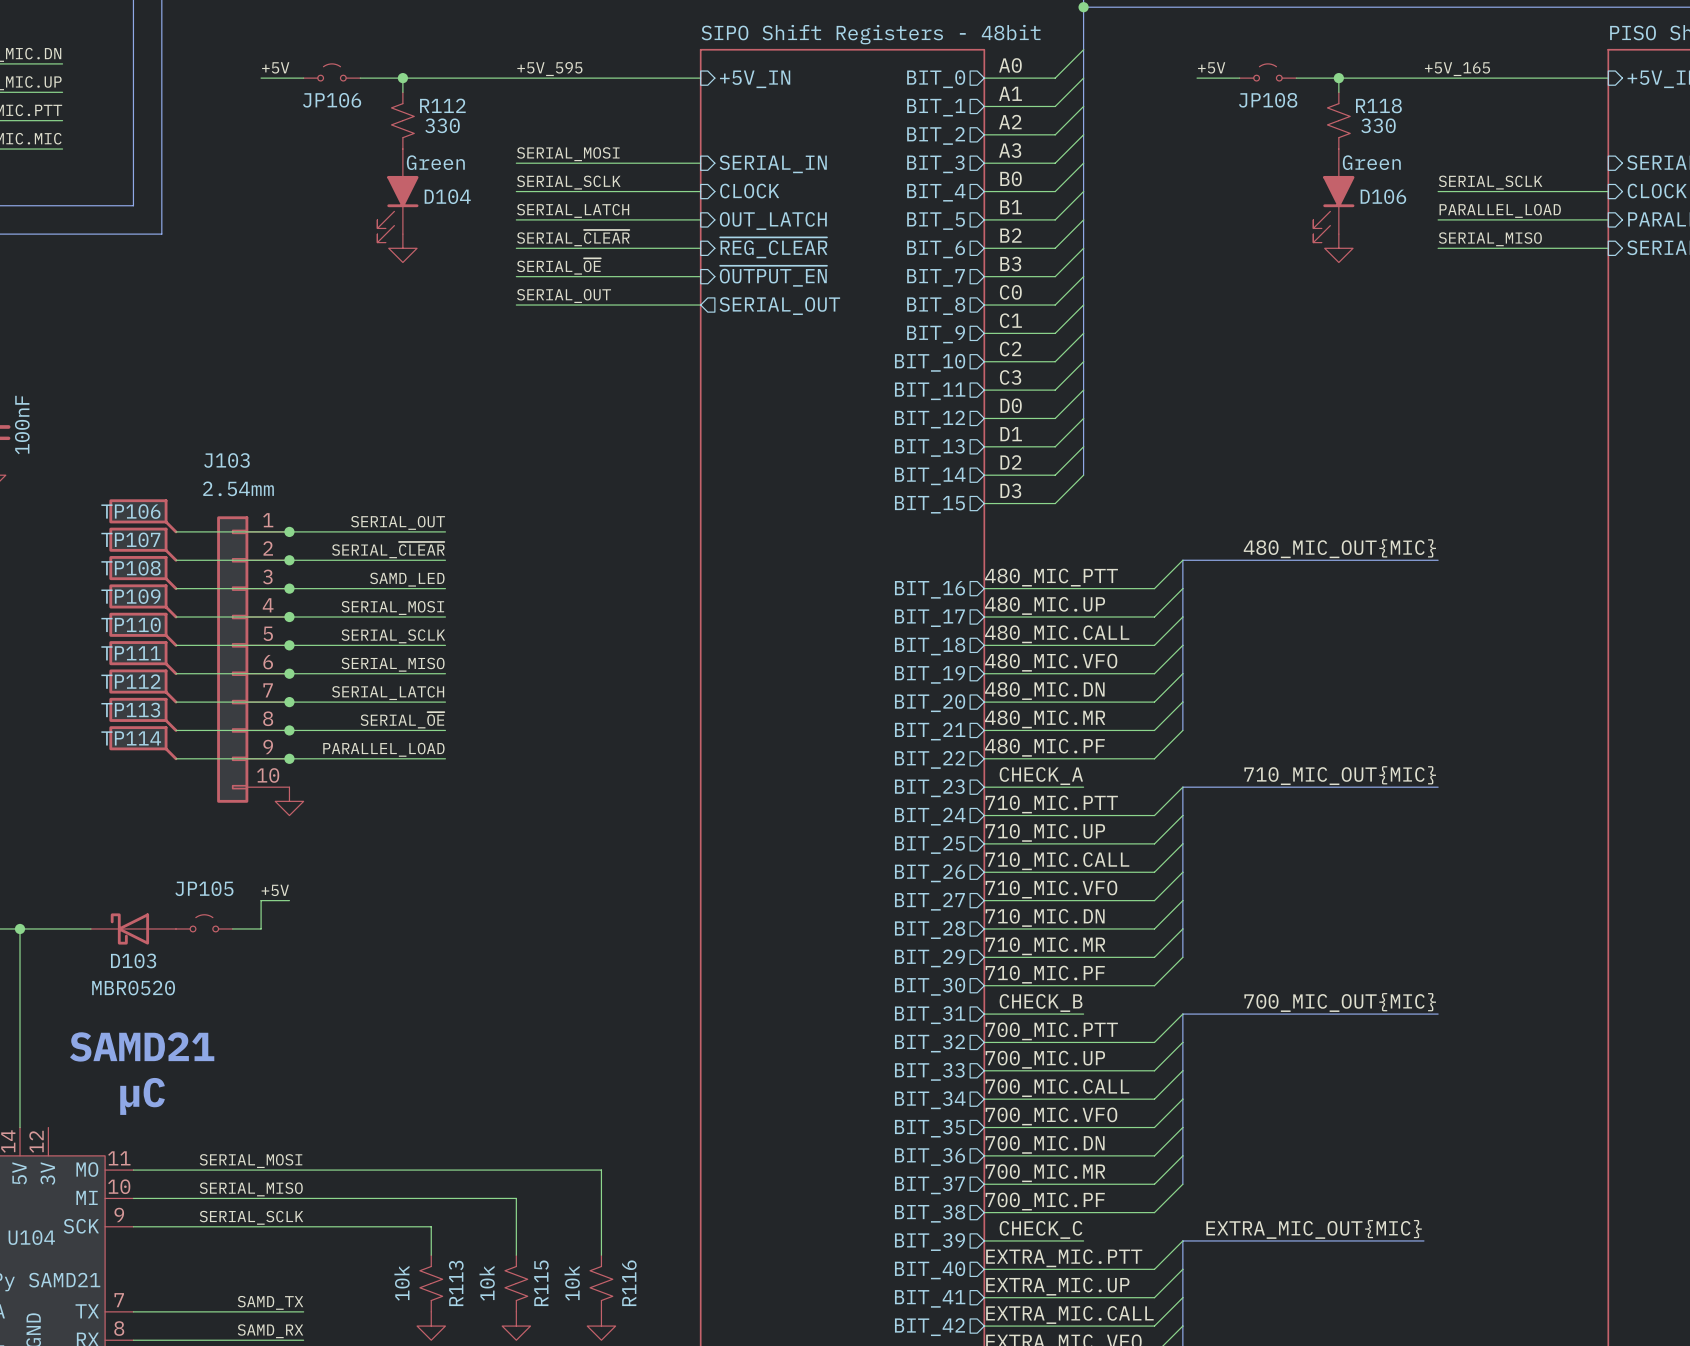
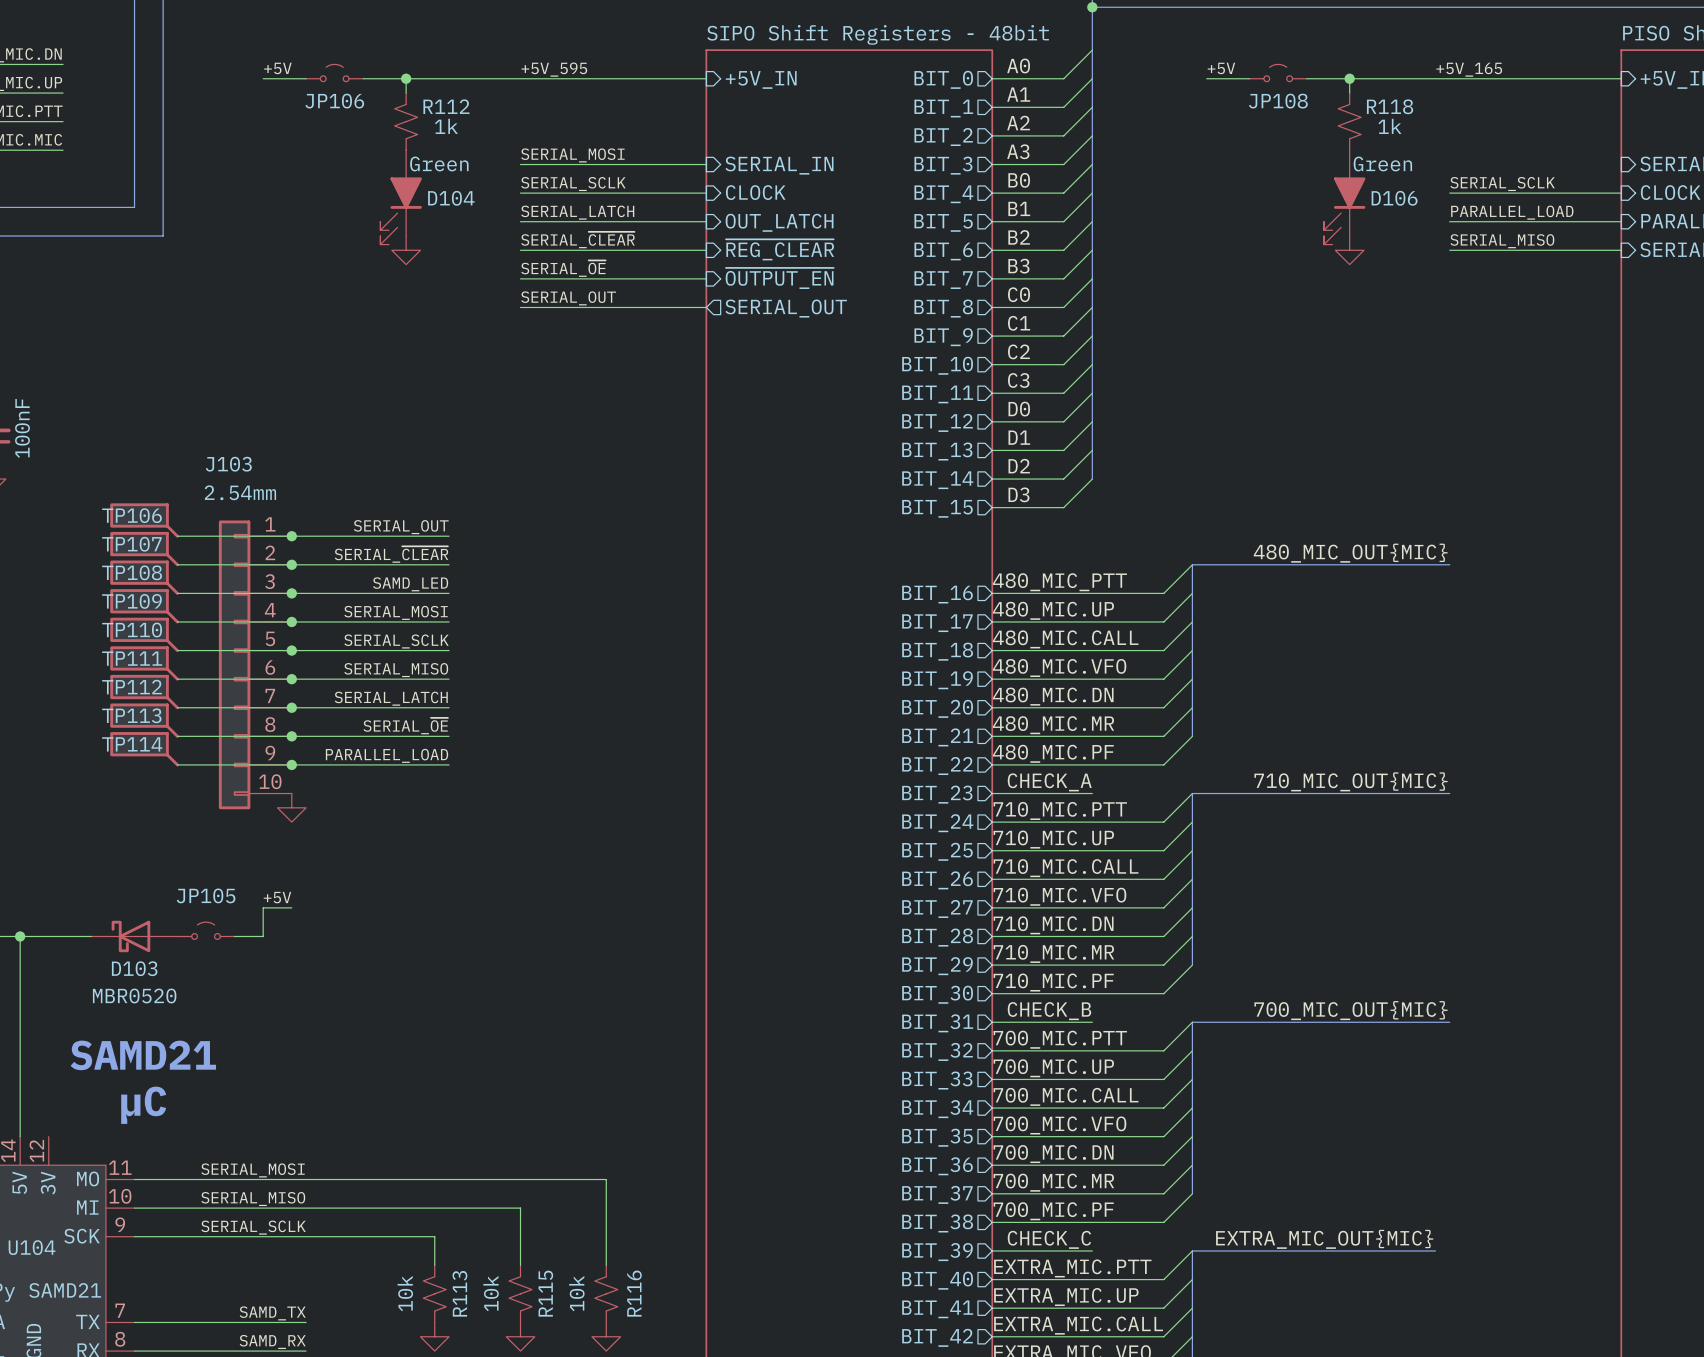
R112 value: 330 (442, 125) -> 1k (446, 126)
R118 value: 330 (1378, 125) -> 1k (1389, 126)

